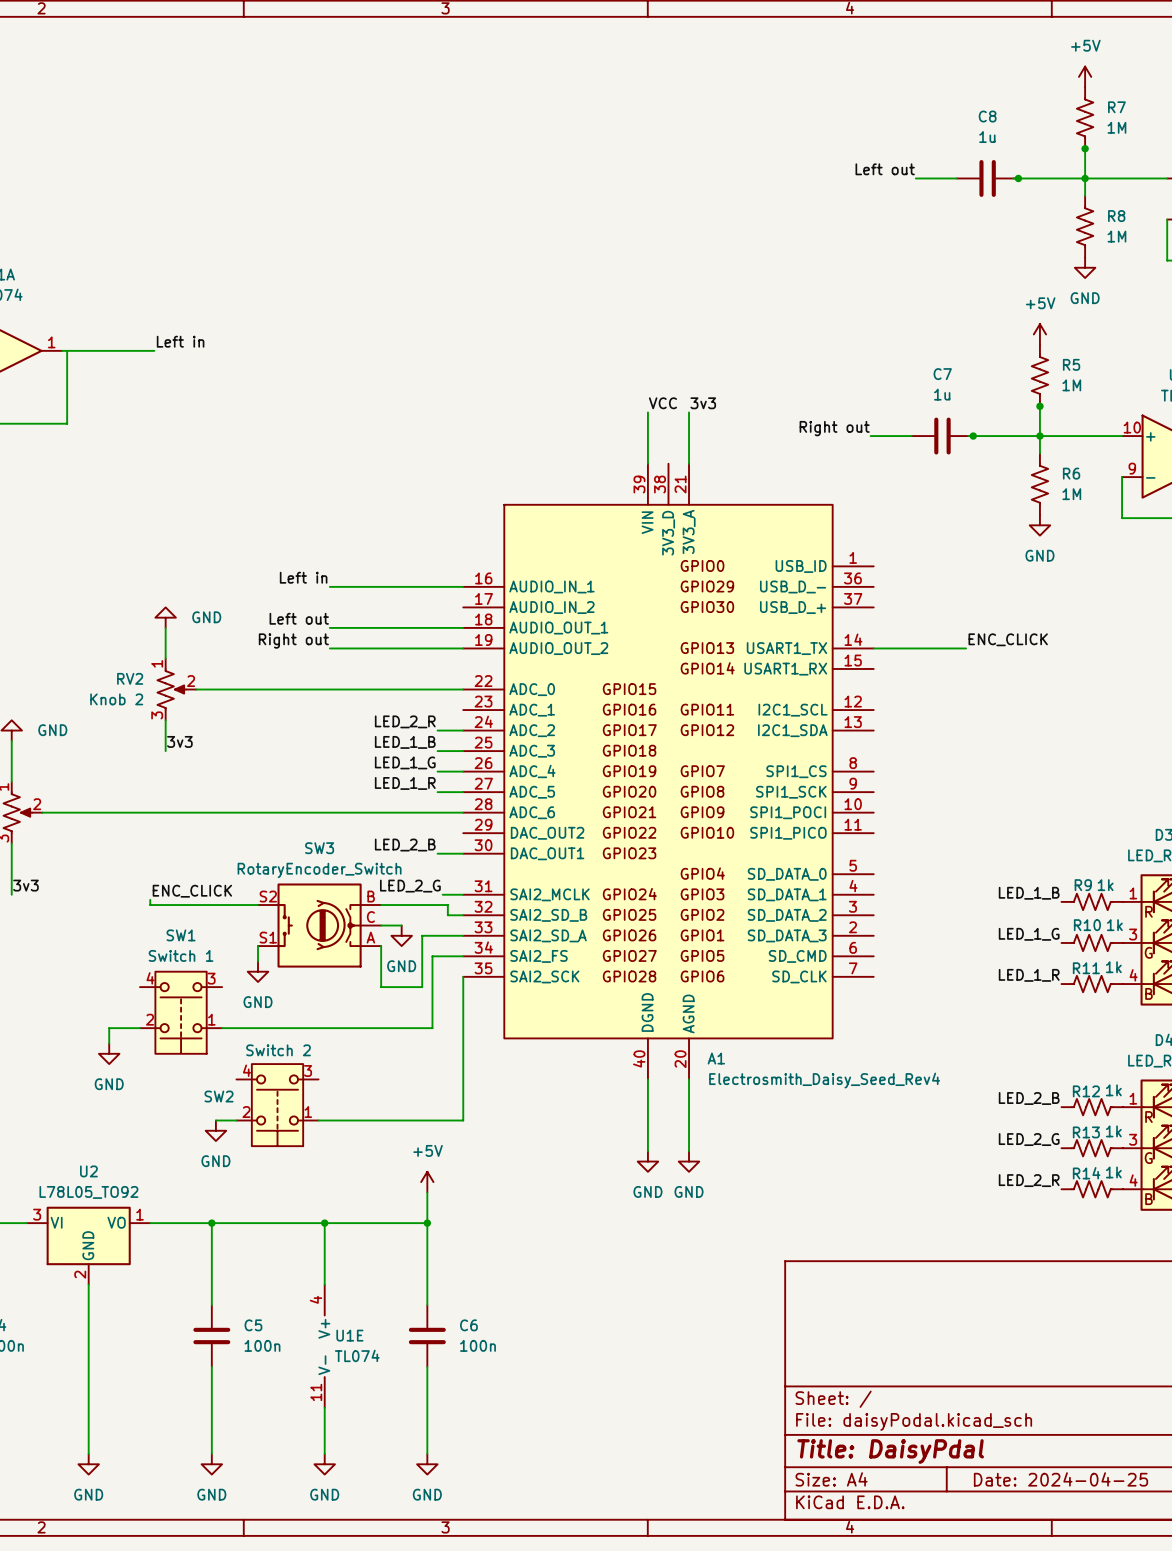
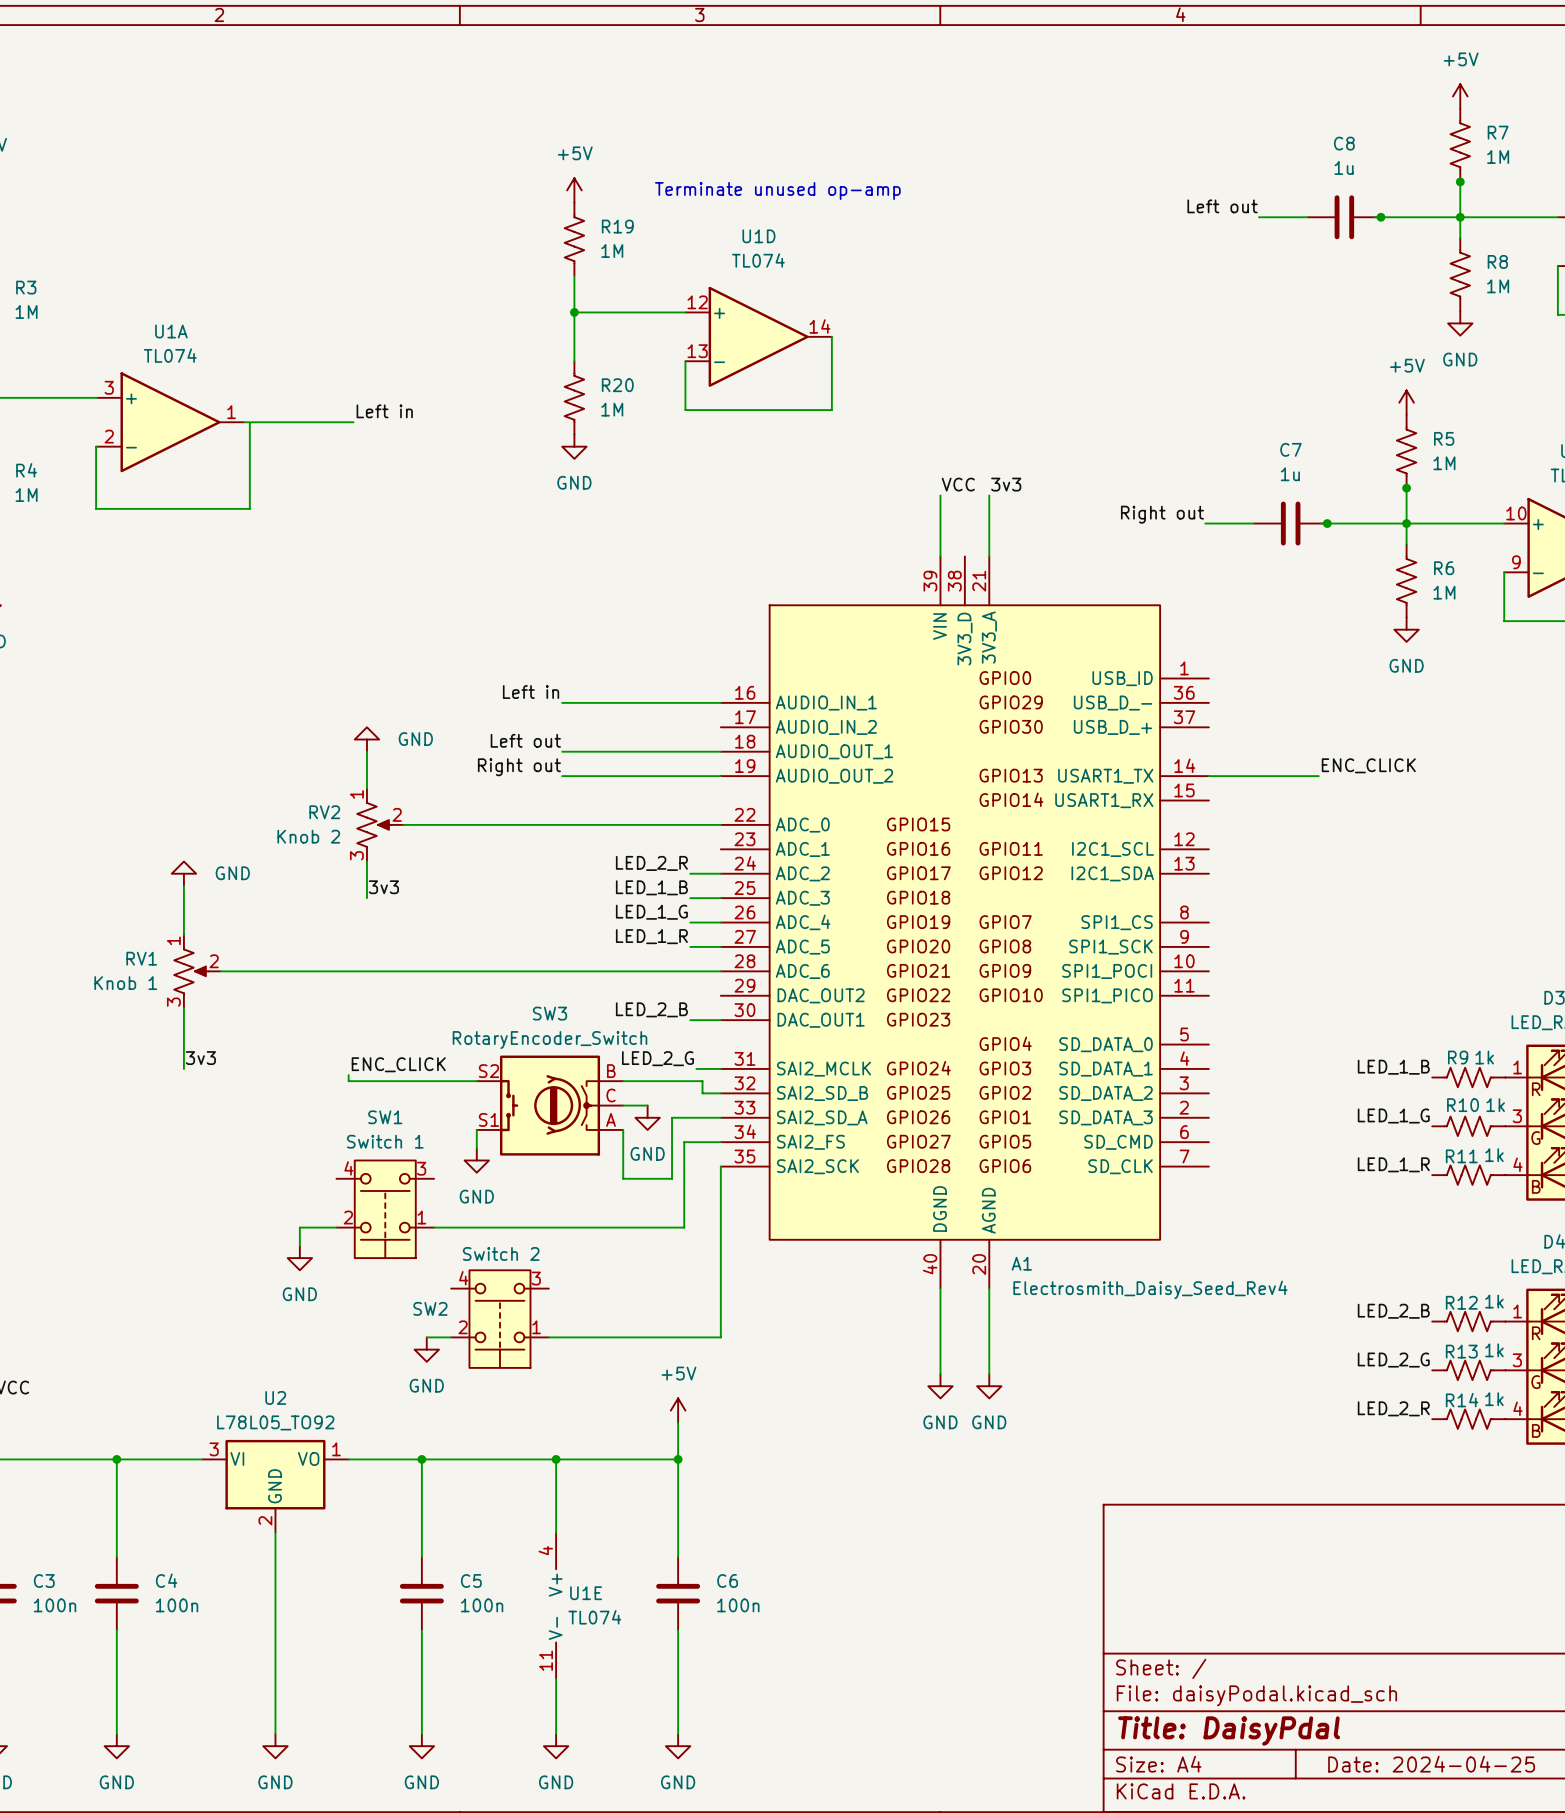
power symbol: none -> +5V (574, 190)
text: none -> Terminate unused op-amp (777, 191)
R19: none -> 1M (574, 239)
wire: none -> (574, 275) (574, 361)
wire: none -> (574, 312) (685, 312)
junction: none -> (574, 312)
U1D: none -> TL074 (758, 336)
wire: none -> (831, 336) (831, 410) (685, 410) (685, 361)
R20: none -> 1M (574, 397)
power symbol: none -> GND (574, 446)

